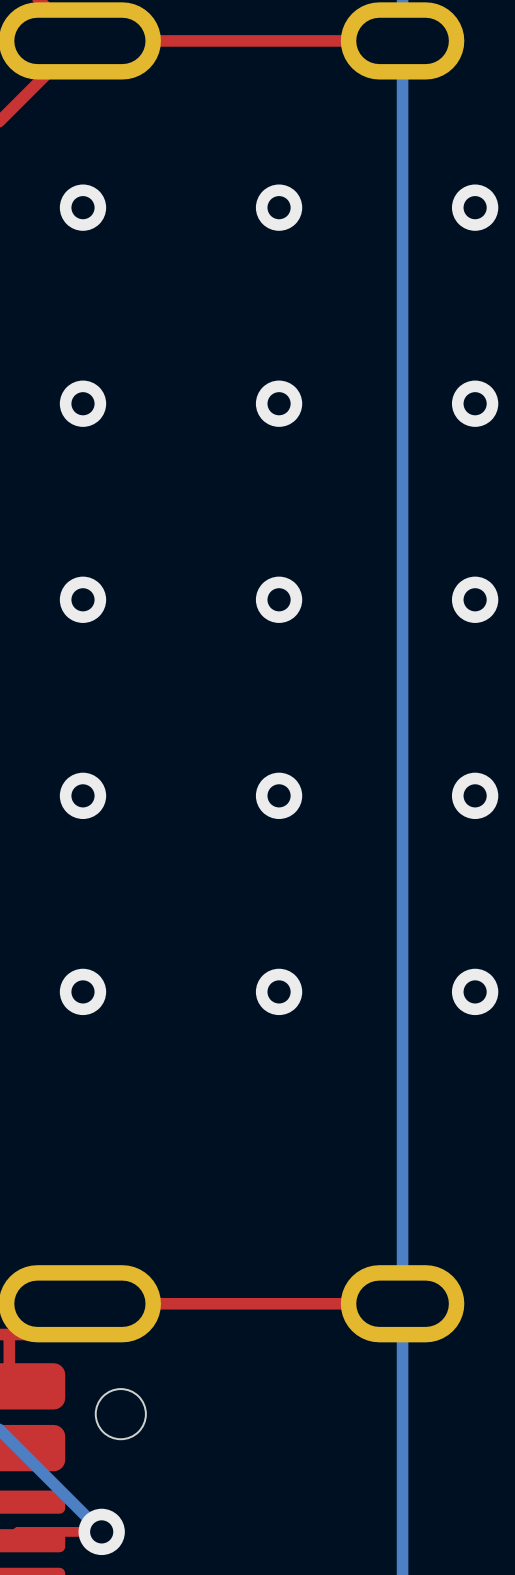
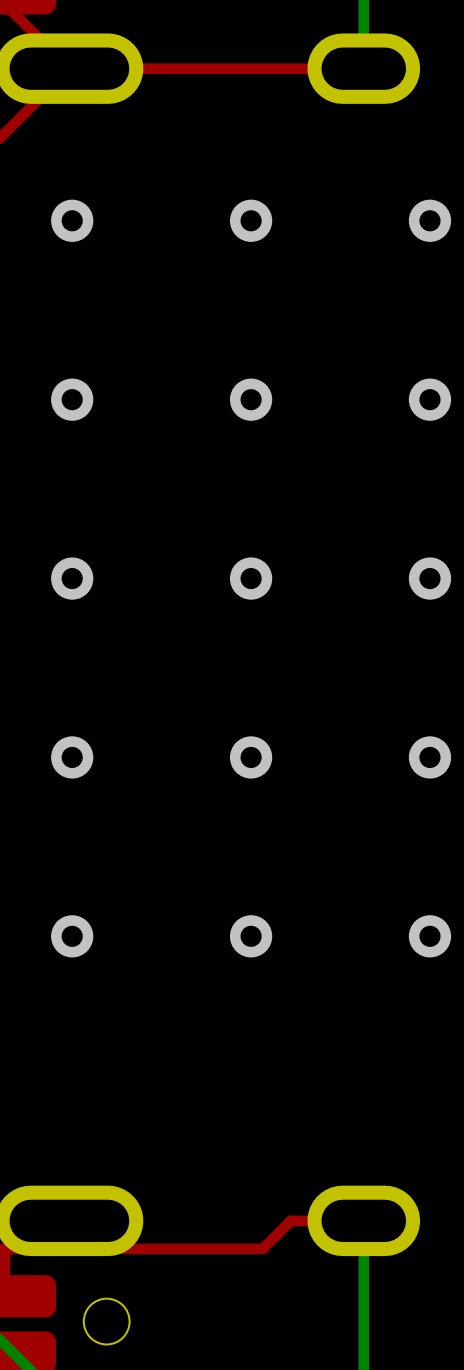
bottom track: (402, 40) (402, 1303) -> none
top track: (322, 1303) (79, 1303) -> (290, 1220) (262, 1248) (41, 1248)

